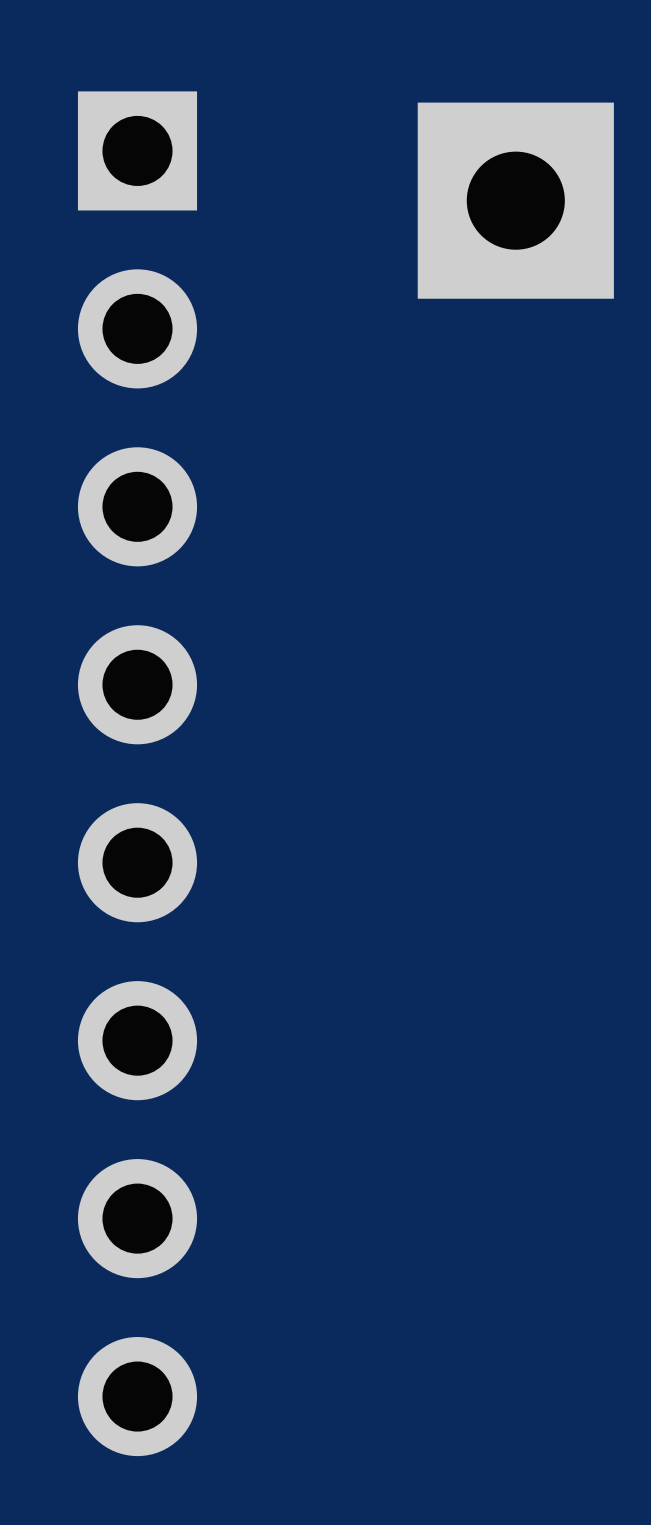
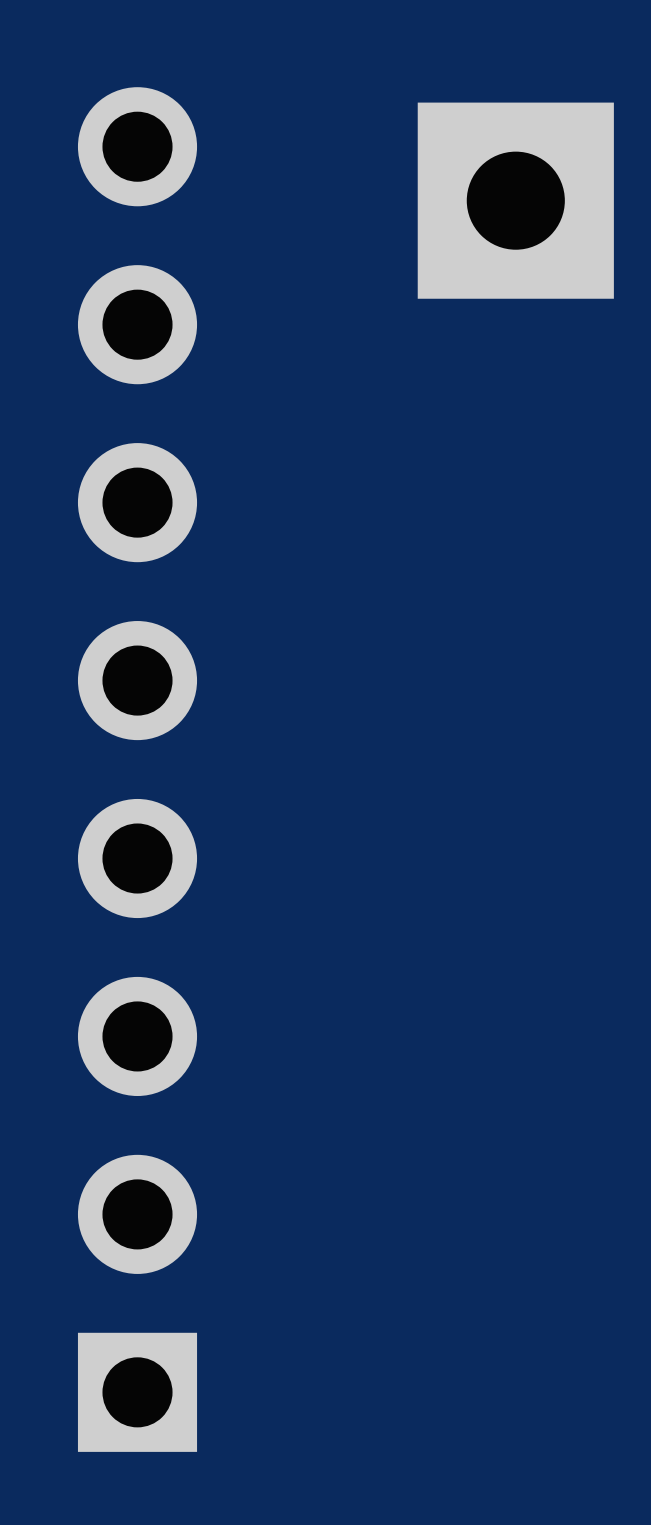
part rotation: 0° (137, 773) -> 180° (137, 769)

